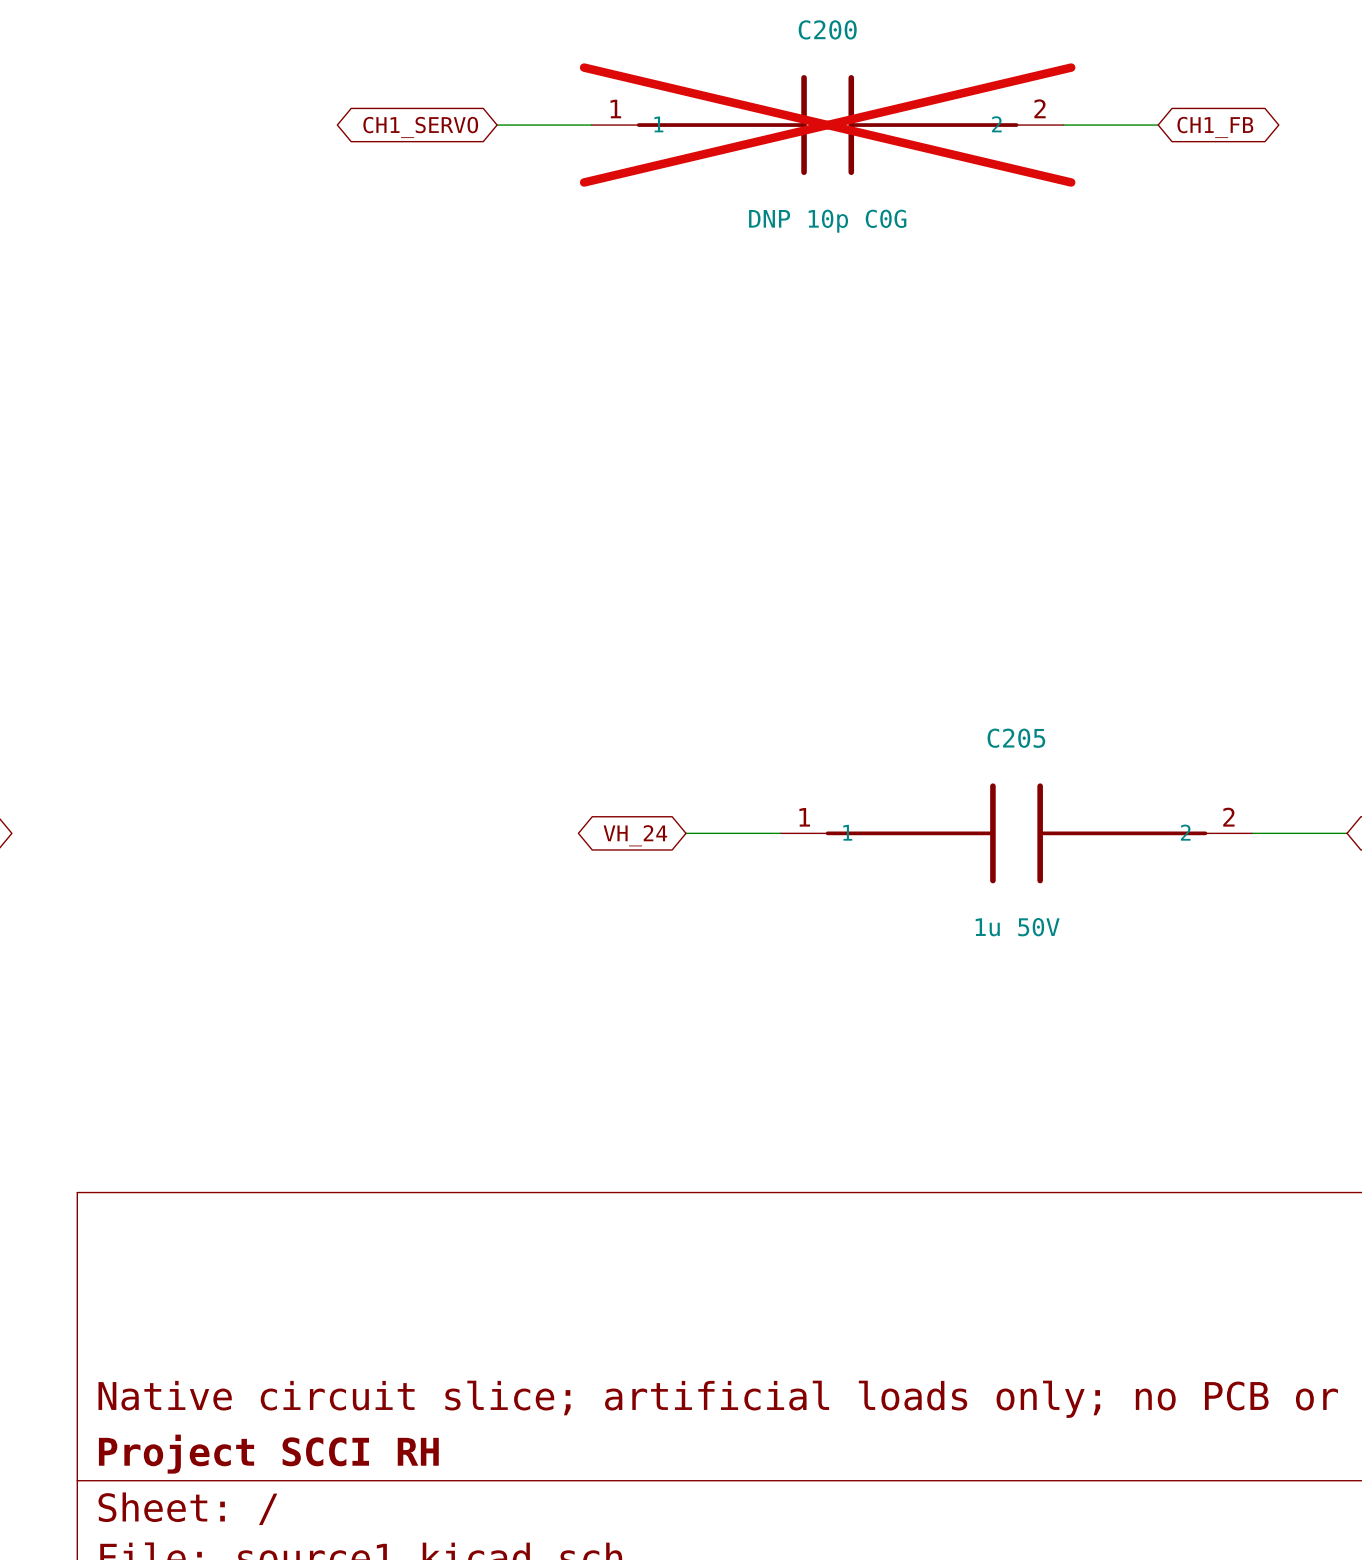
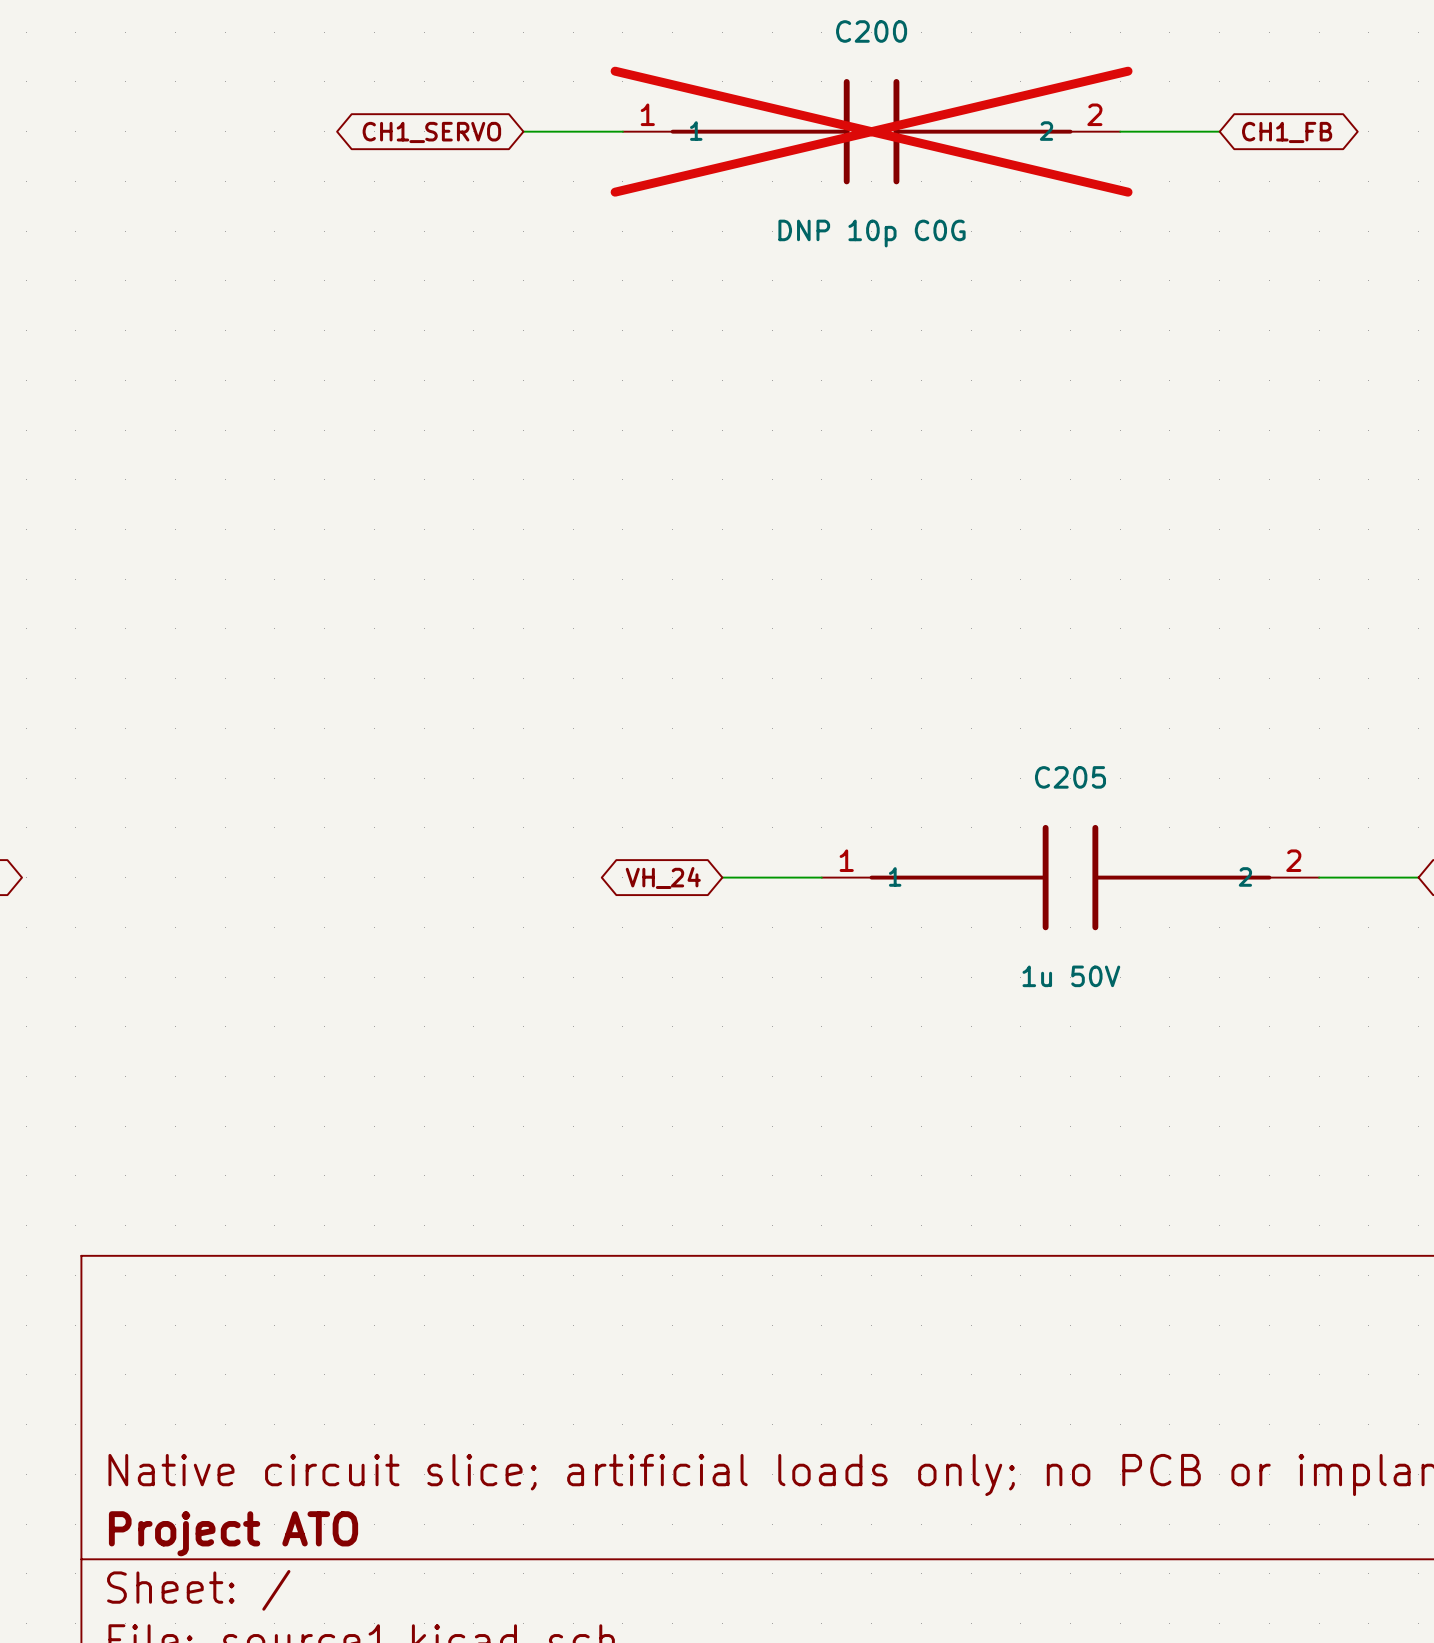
title block: Project SCCI RH (268, 1454) -> Project ATO (233, 1533)

